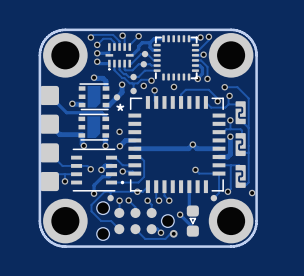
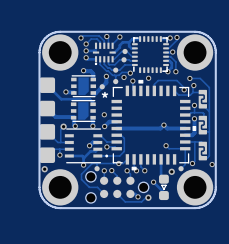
part footprint: [128, 96, 226, 194] -> [111, 79, 197, 171]
track: none -> (63, 126) (60, 129) (60, 142)
via: none -> (63, 126)
track: (76, 165) (87, 165) (90, 169) -> none
via: (90, 169) -> none
track: none -> (69, 155) (82, 155) (84, 157)
via: none -> (44, 169)
via: none -> (171, 171)

